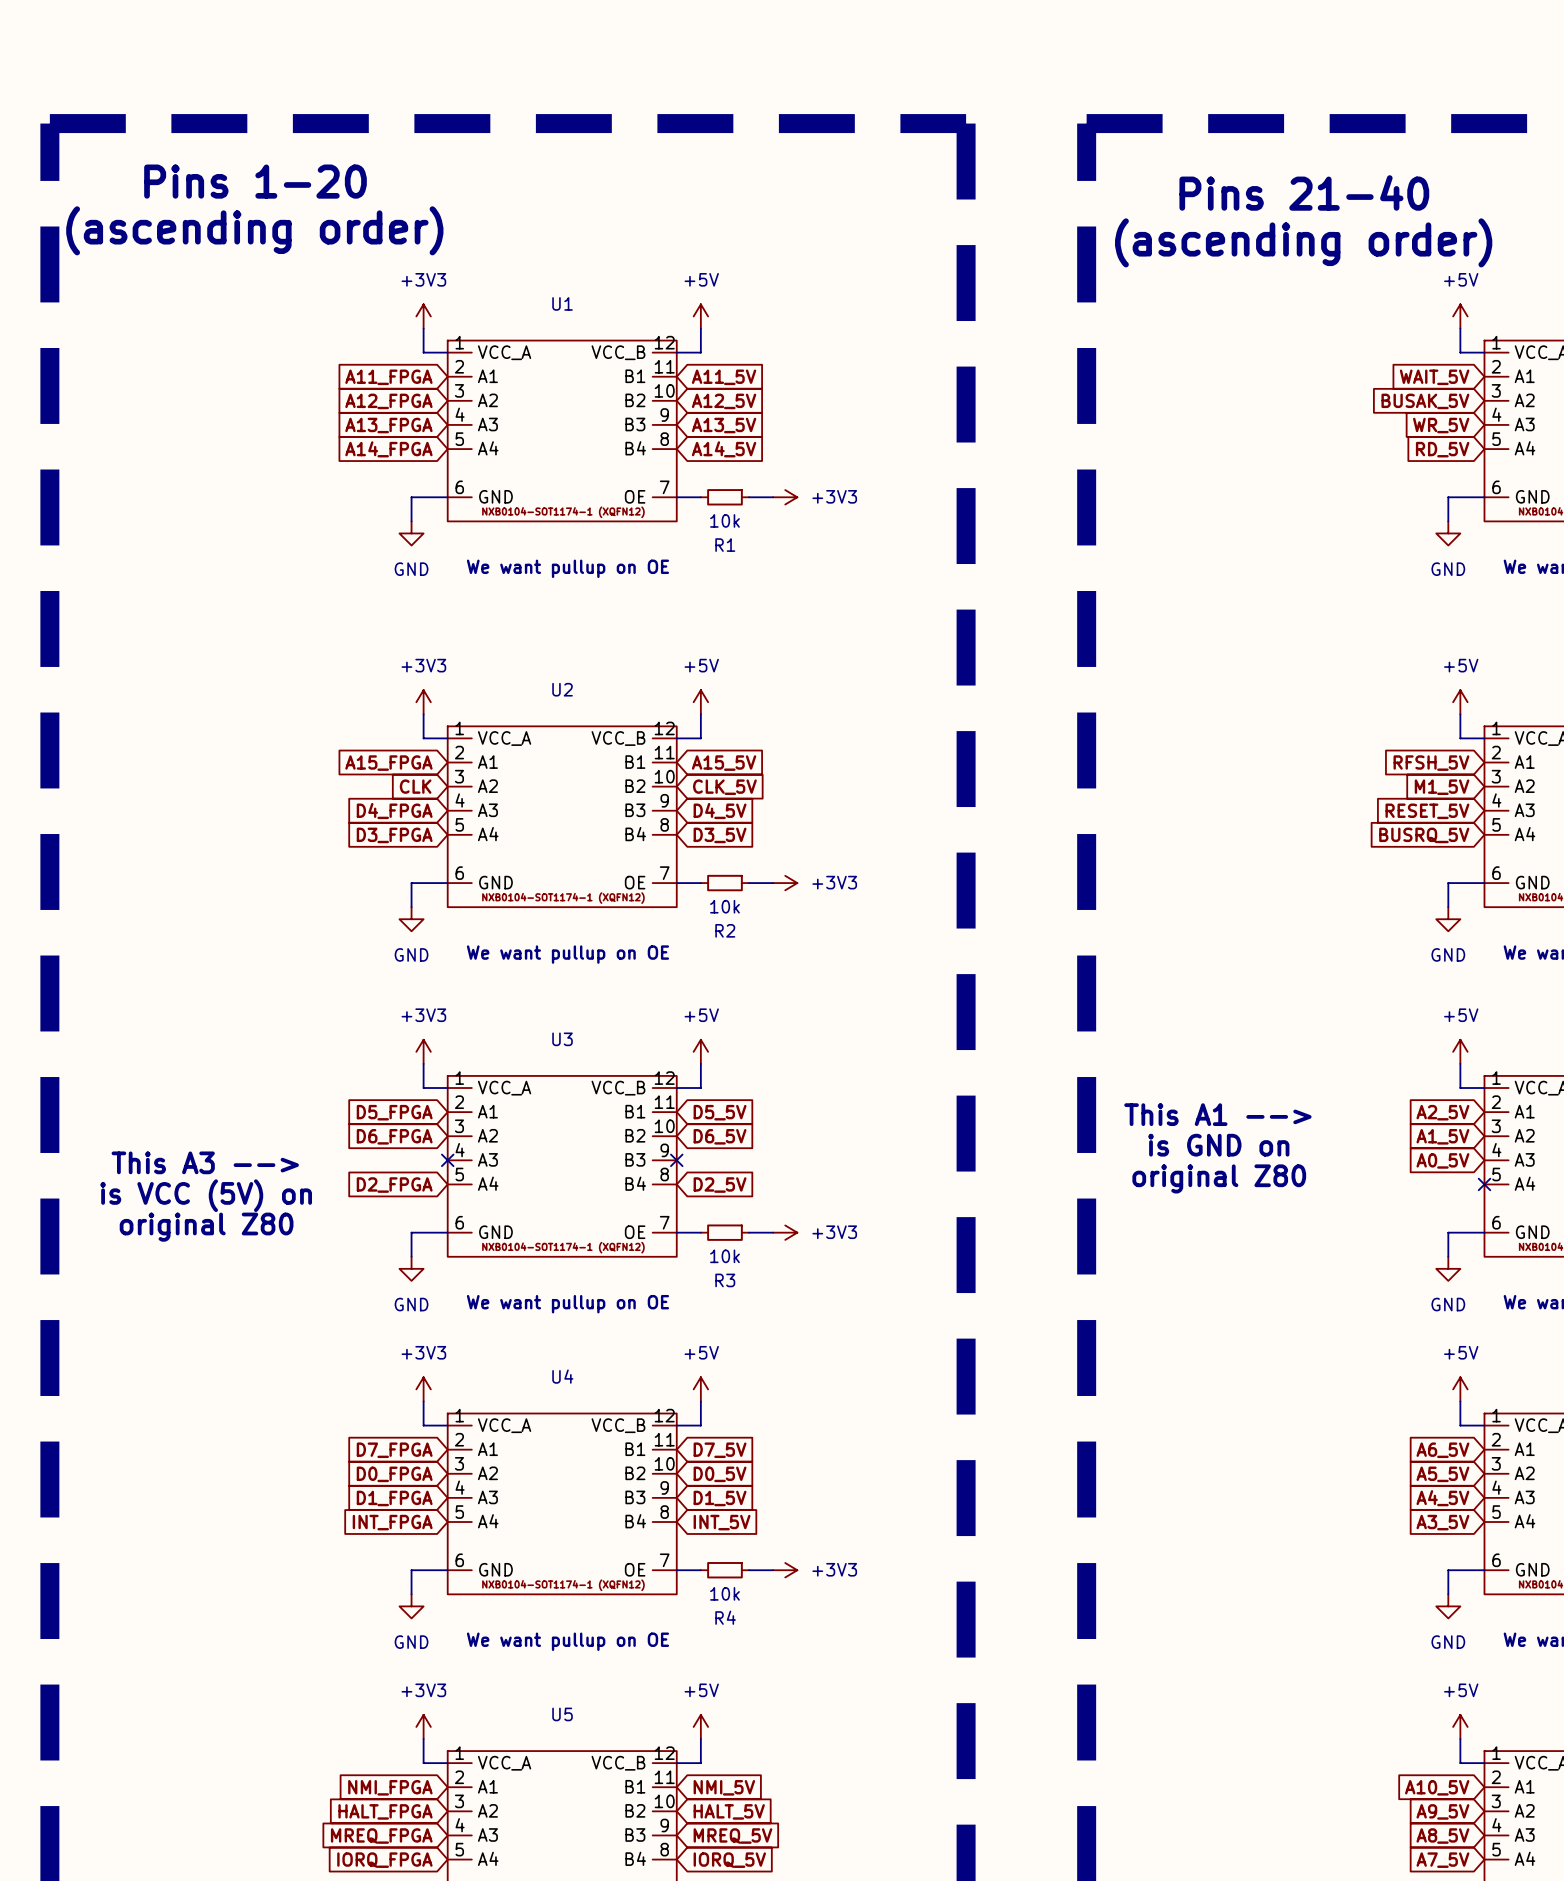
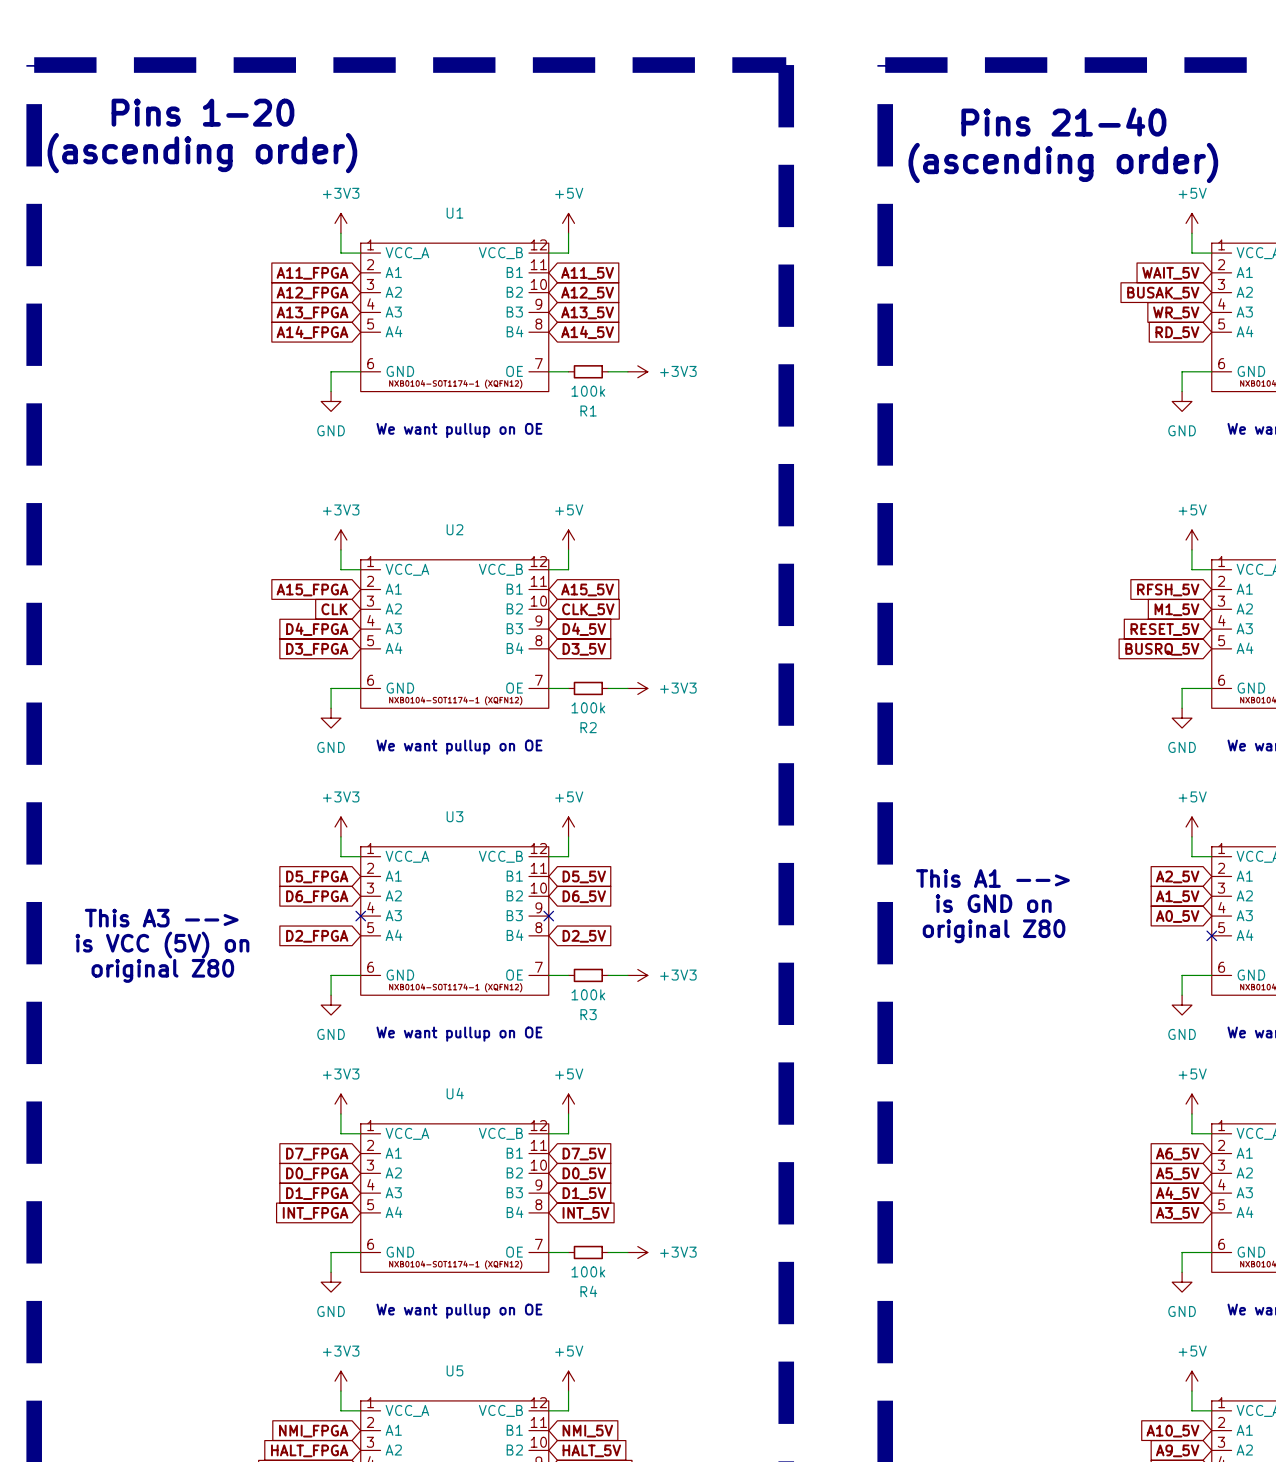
R1 value: 10k (724, 520) -> 100k (588, 391)
R2 value: 10k (724, 906) -> 100k (588, 707)
R3 value: 10k (724, 1256) -> 100k (588, 994)
R4 value: 10k (724, 1593) -> 100k (588, 1271)

